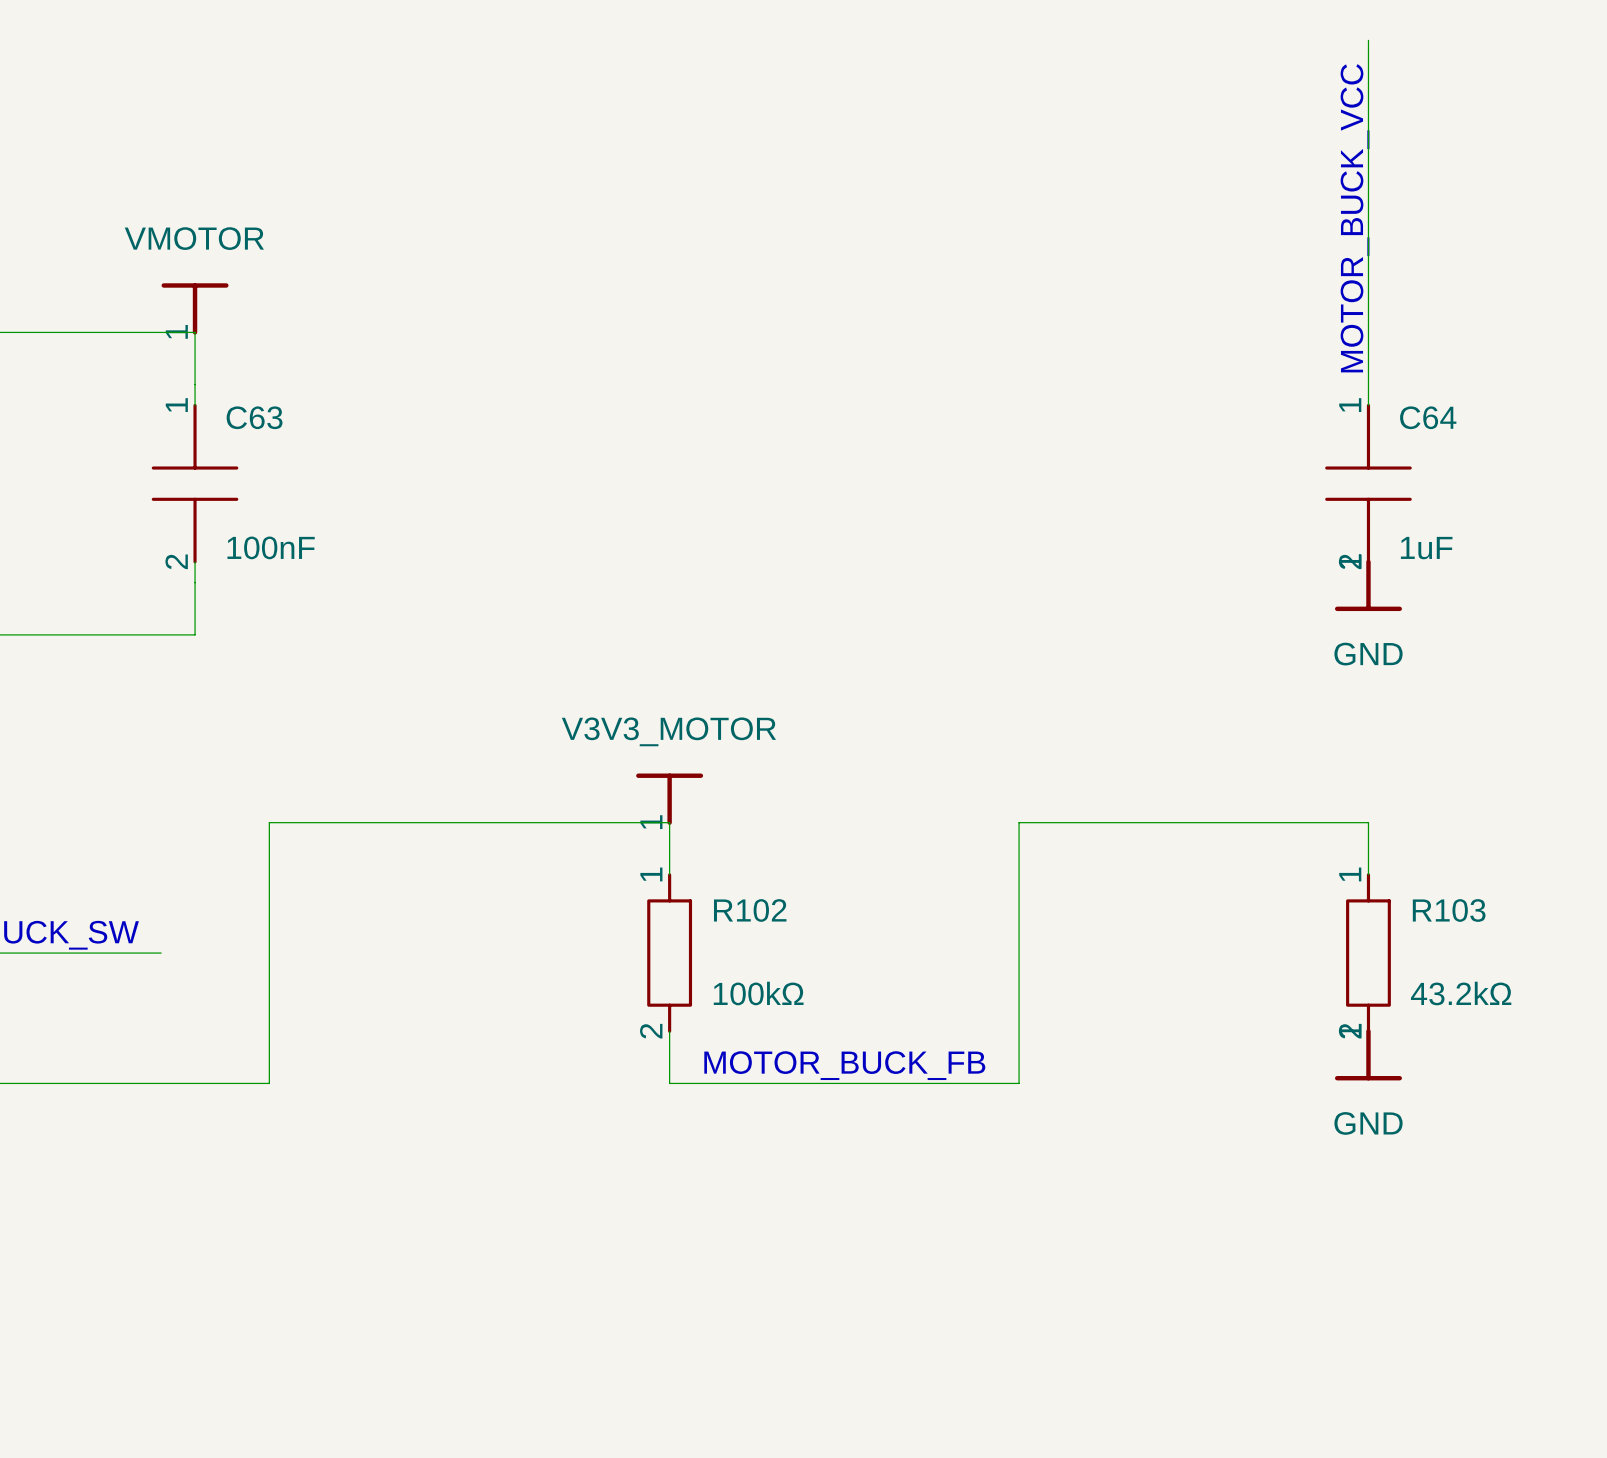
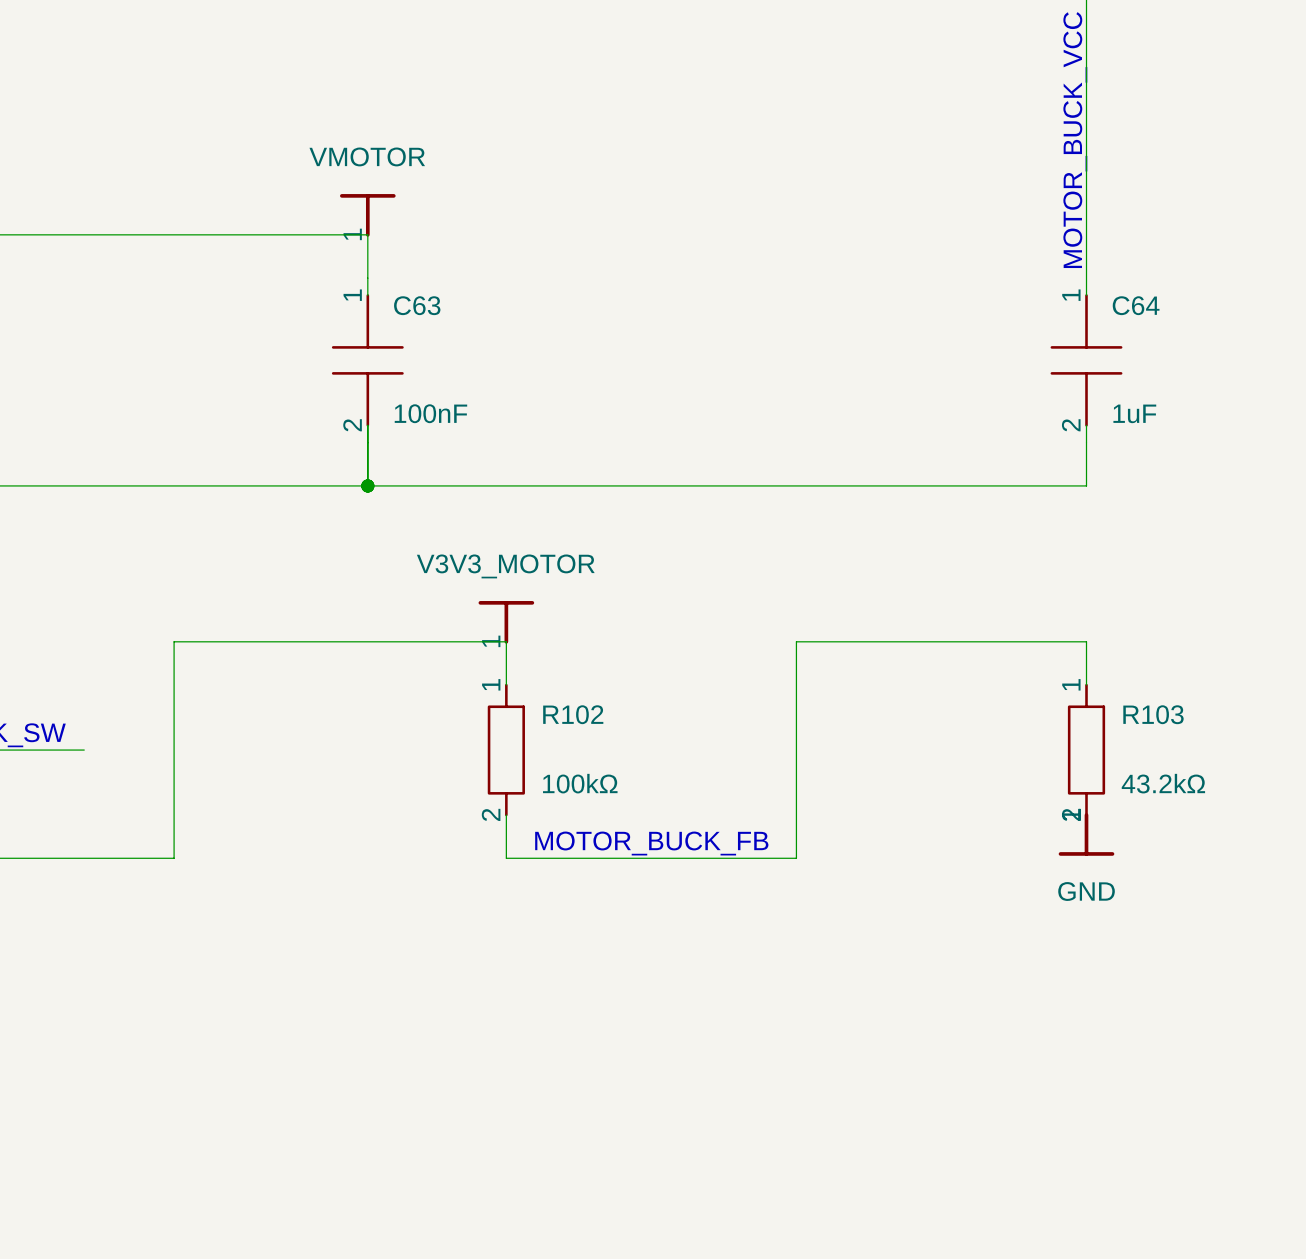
VMOTOR position: (195, 308) -> (367, 215)
wire: (195, 332) (195, 405) -> (112, 234) (367, 234) (367, 295)
C63 position: (195, 483) -> (367, 360)
wire: (195, 561) (195, 634) -> (1086, 425) (1086, 485) (112, 485)
wire: none -> (367, 425) (367, 485)
GND: (1368, 585) -> none
junction: none -> (367, 485)

